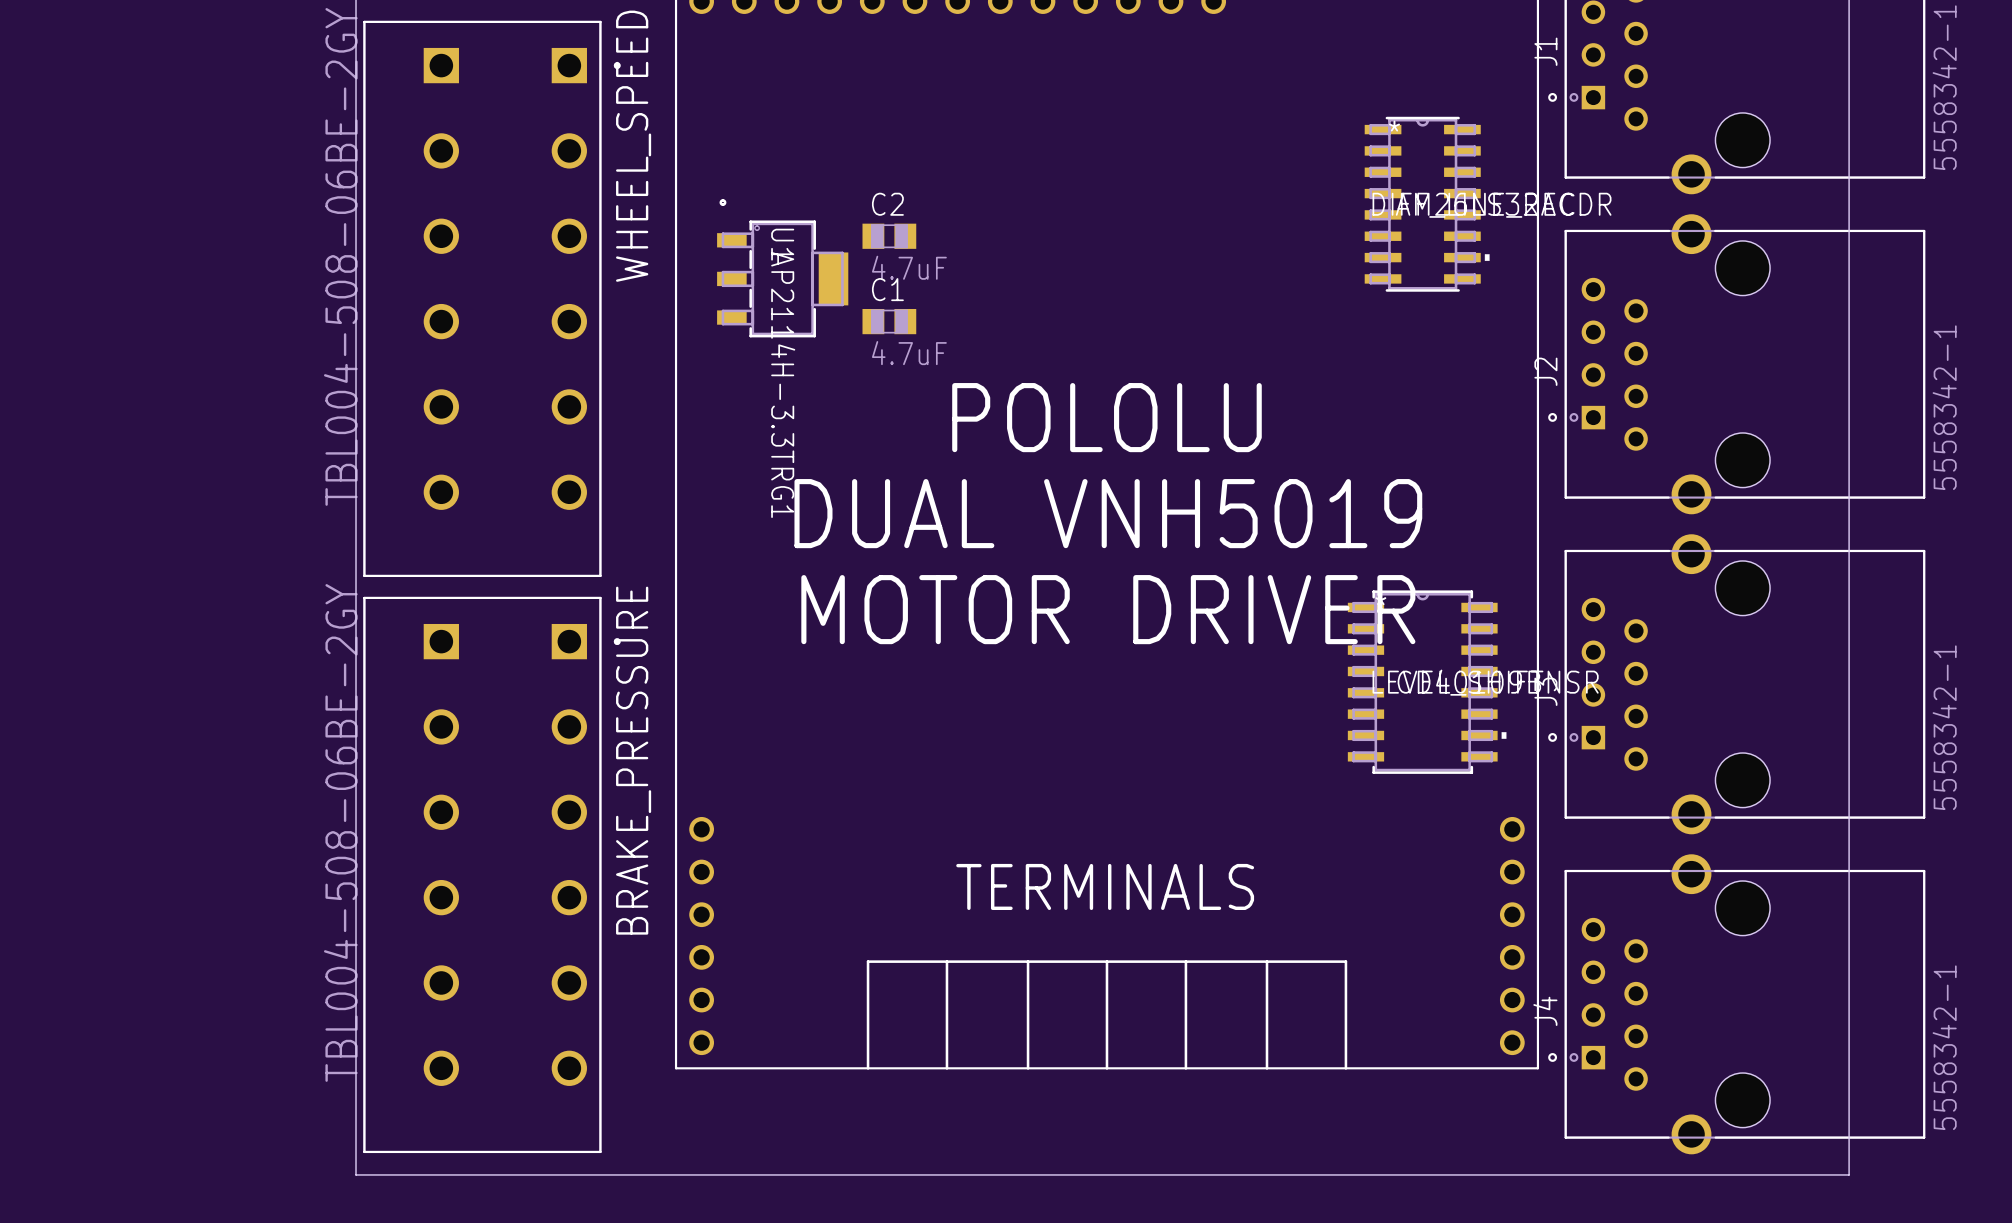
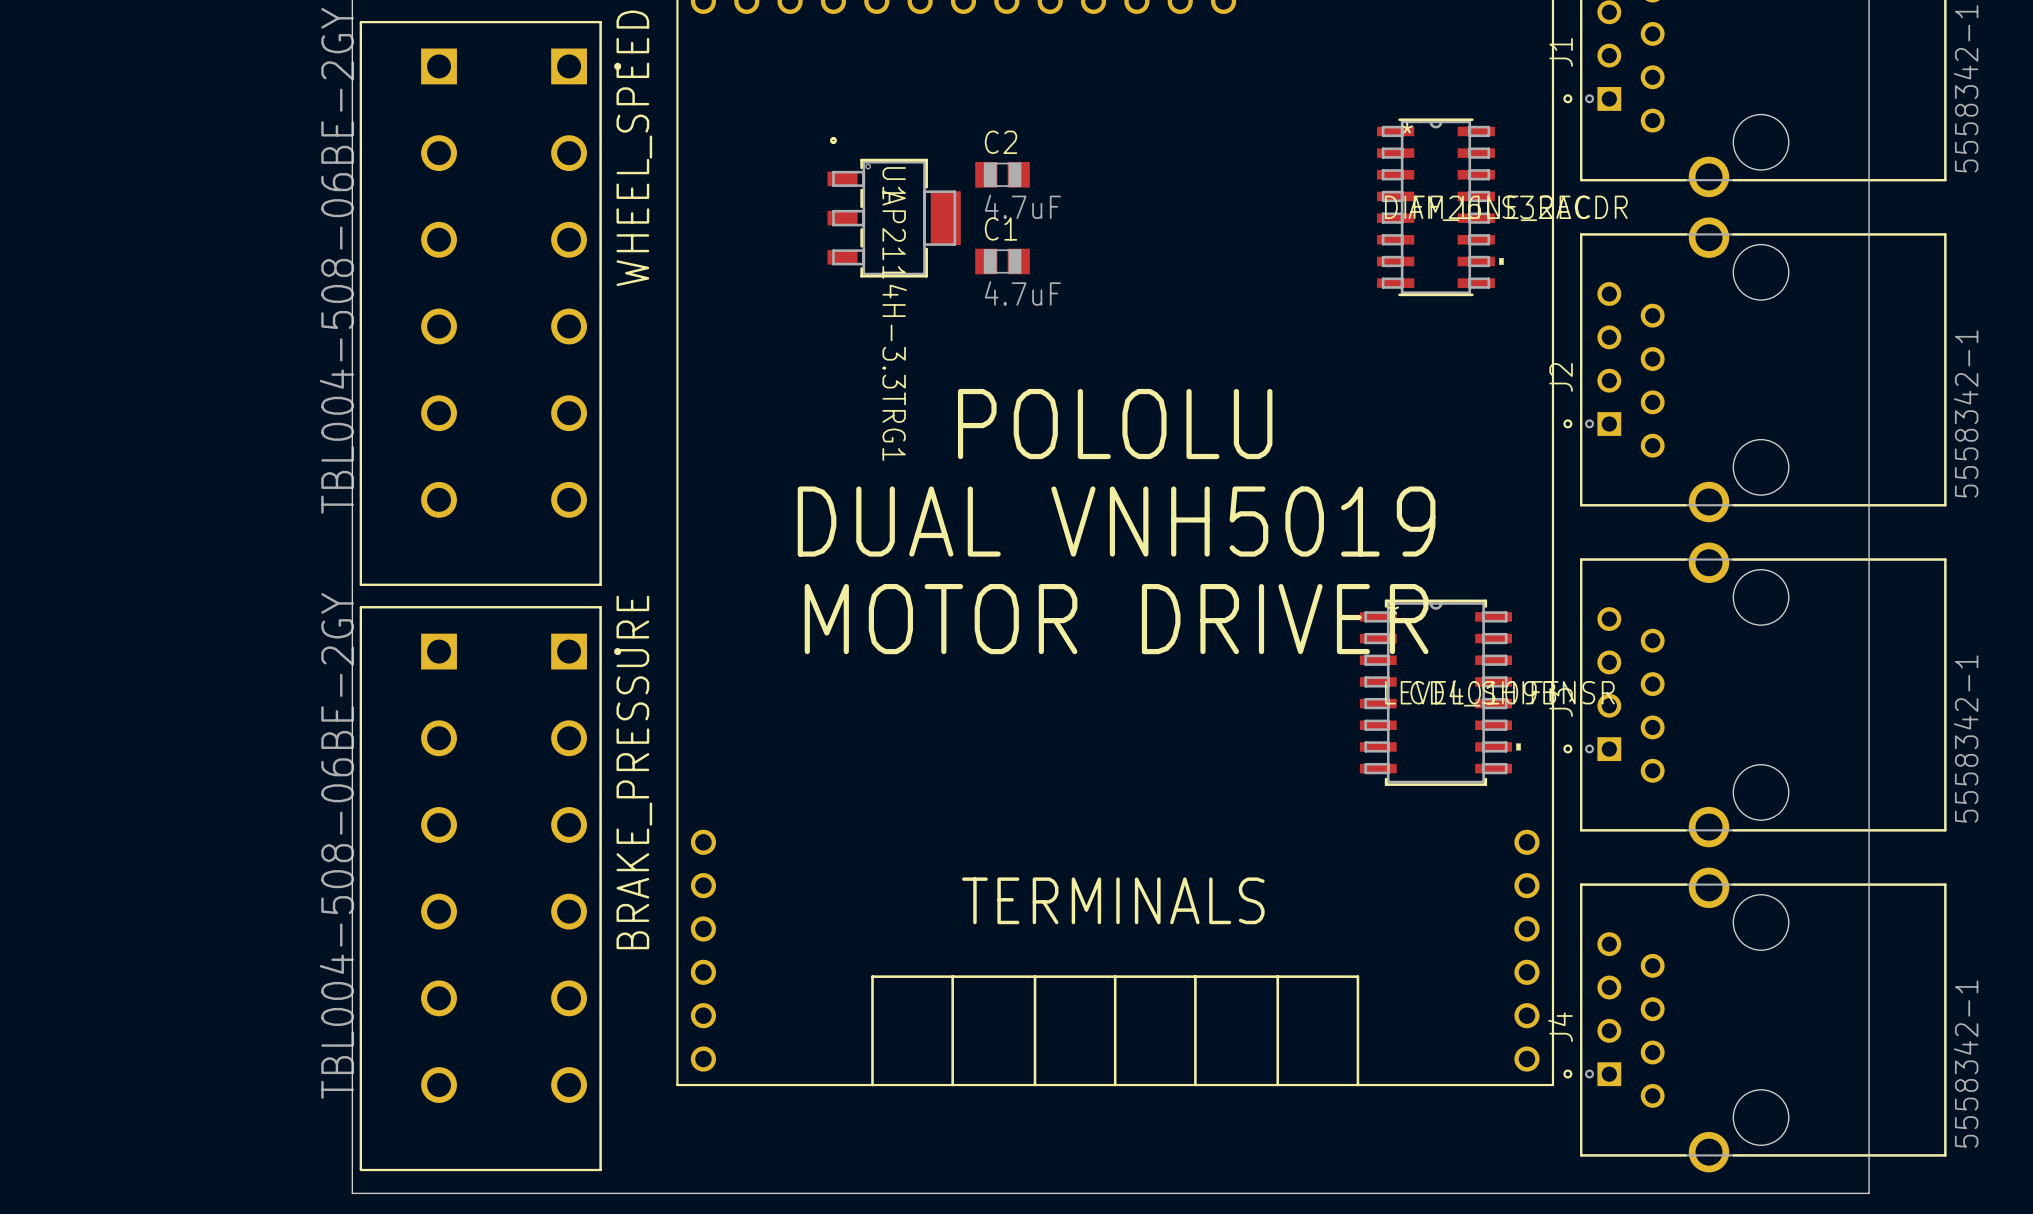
C2 position: (889, 236) -> (1002, 174)
U1 position: (782, 268) -> (894, 207)
C1 position: (889, 321) -> (1002, 261)

